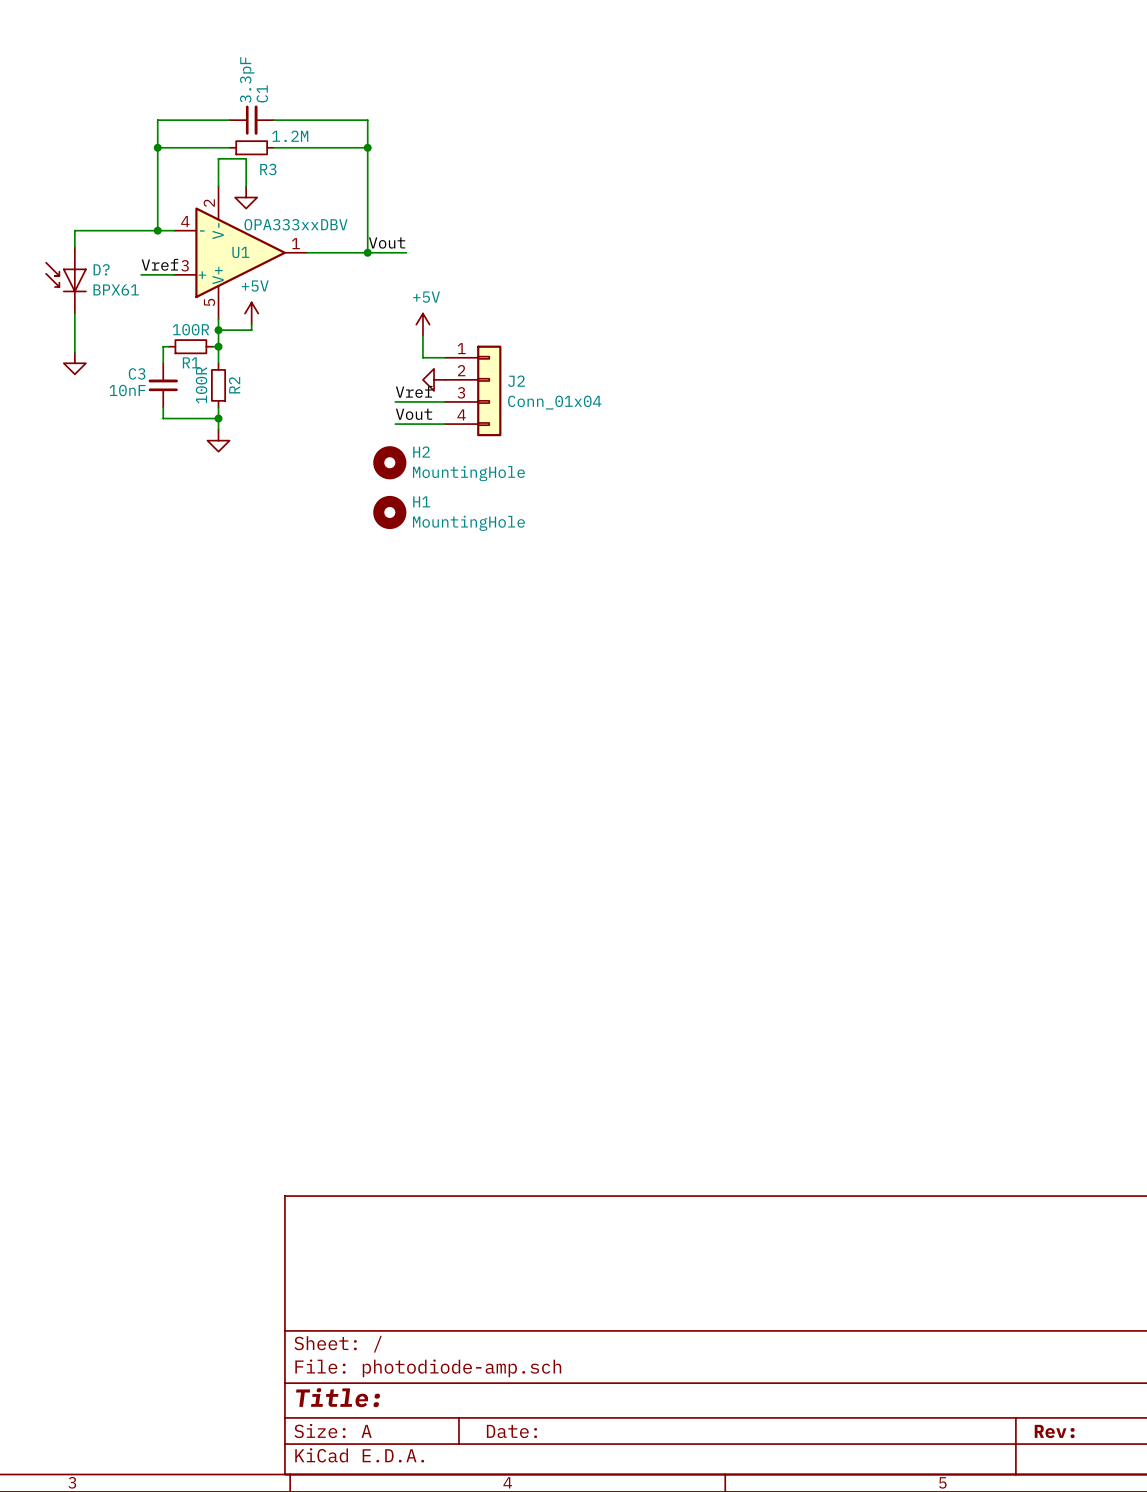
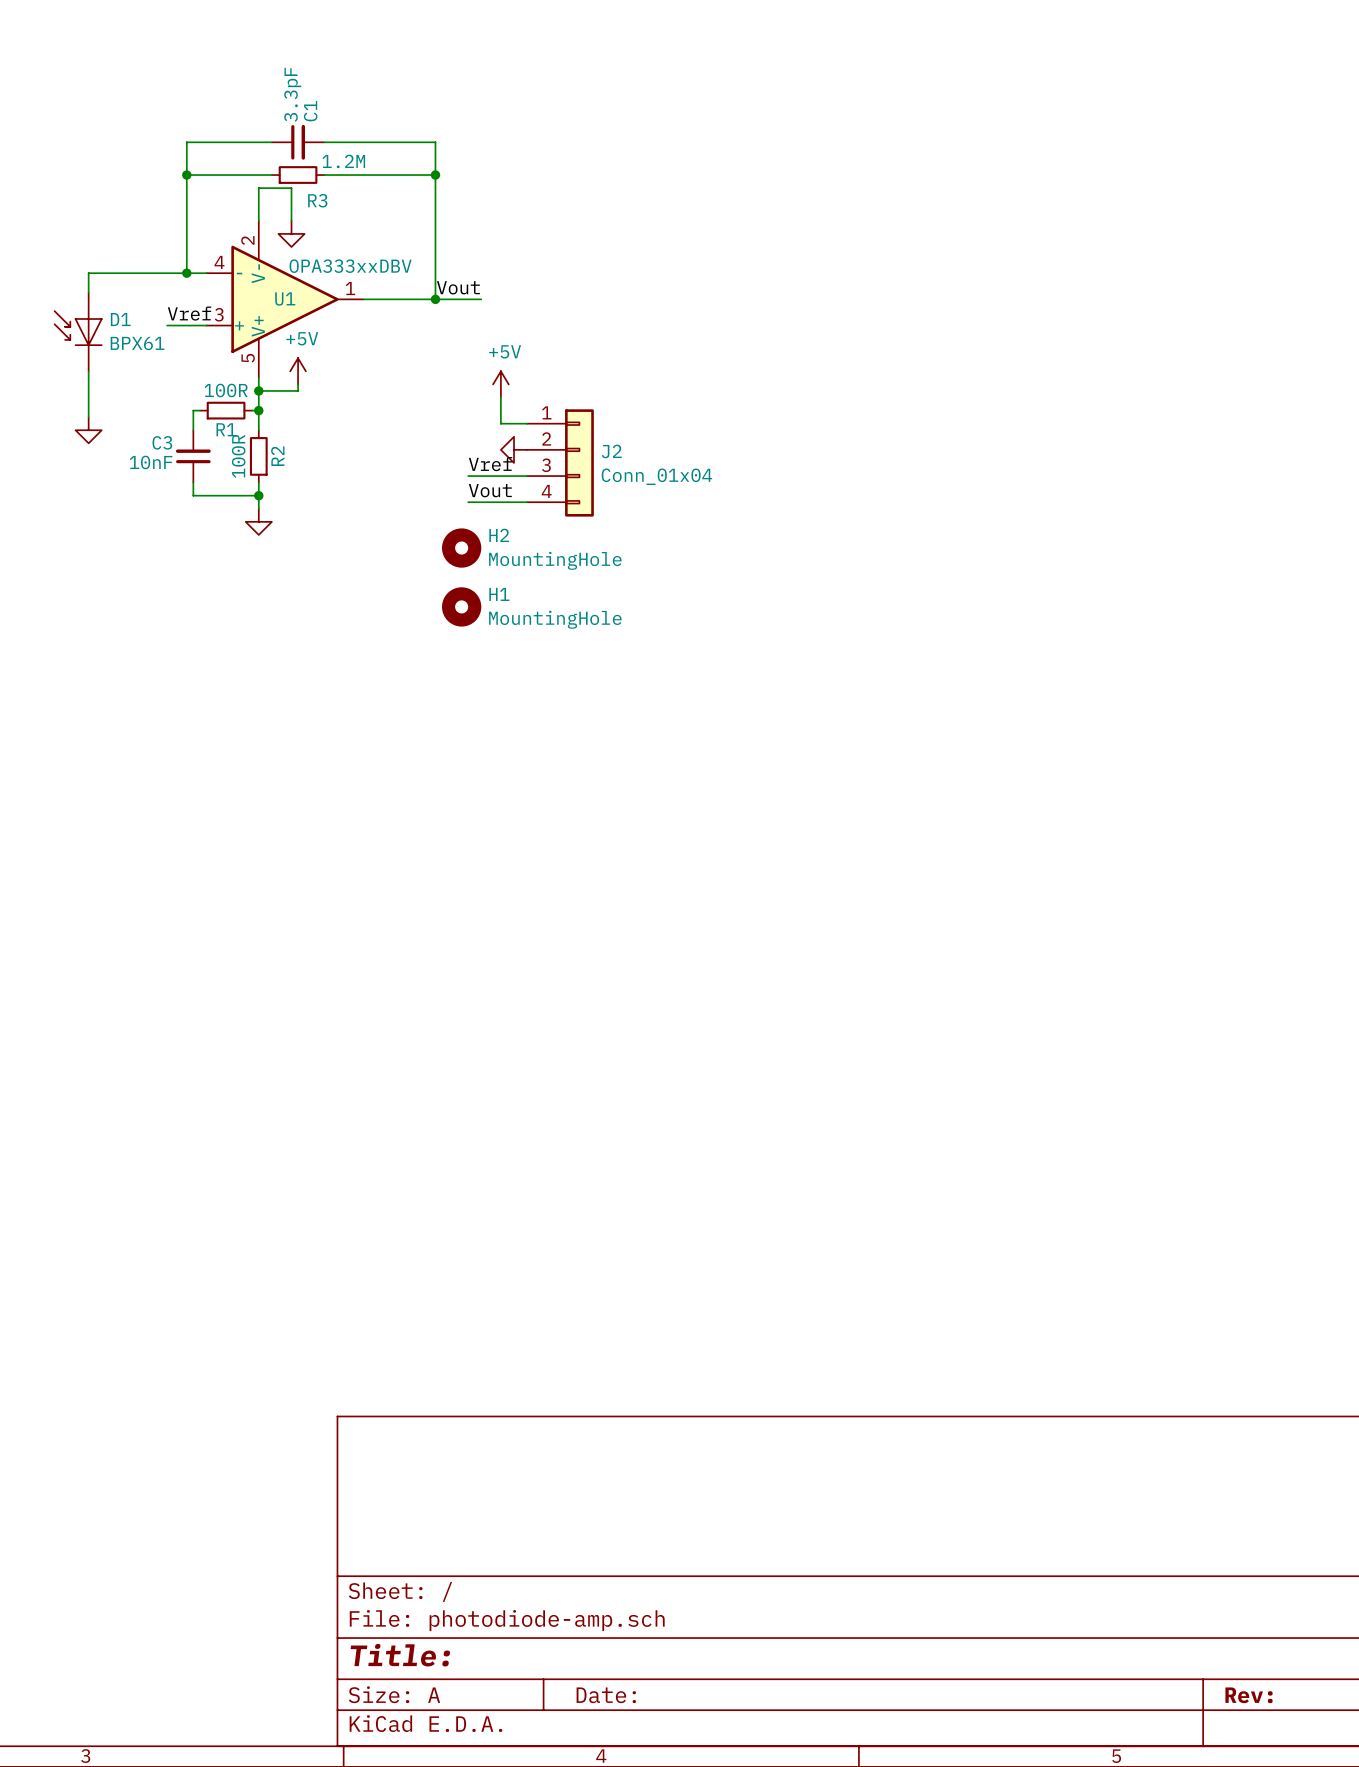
D? name: D? (101, 269) -> D1 (120, 319)

